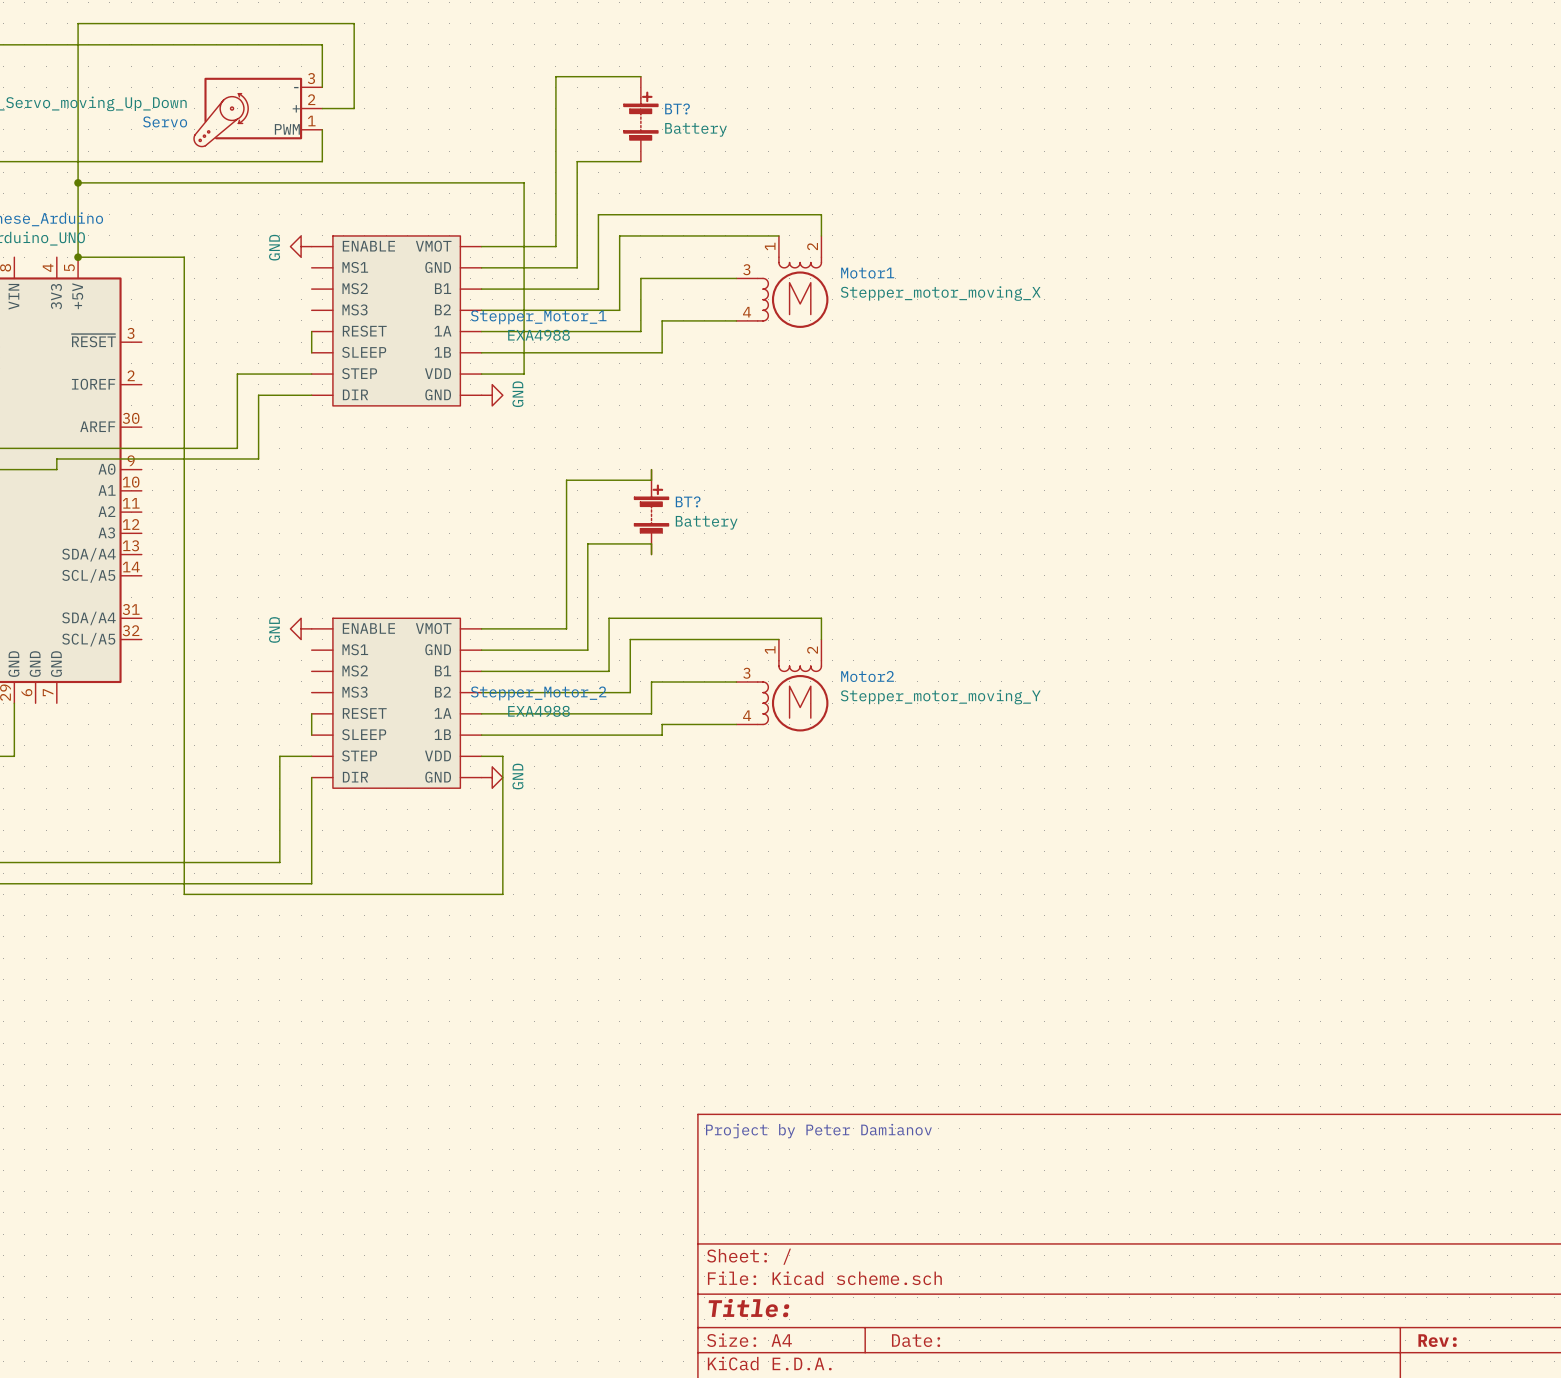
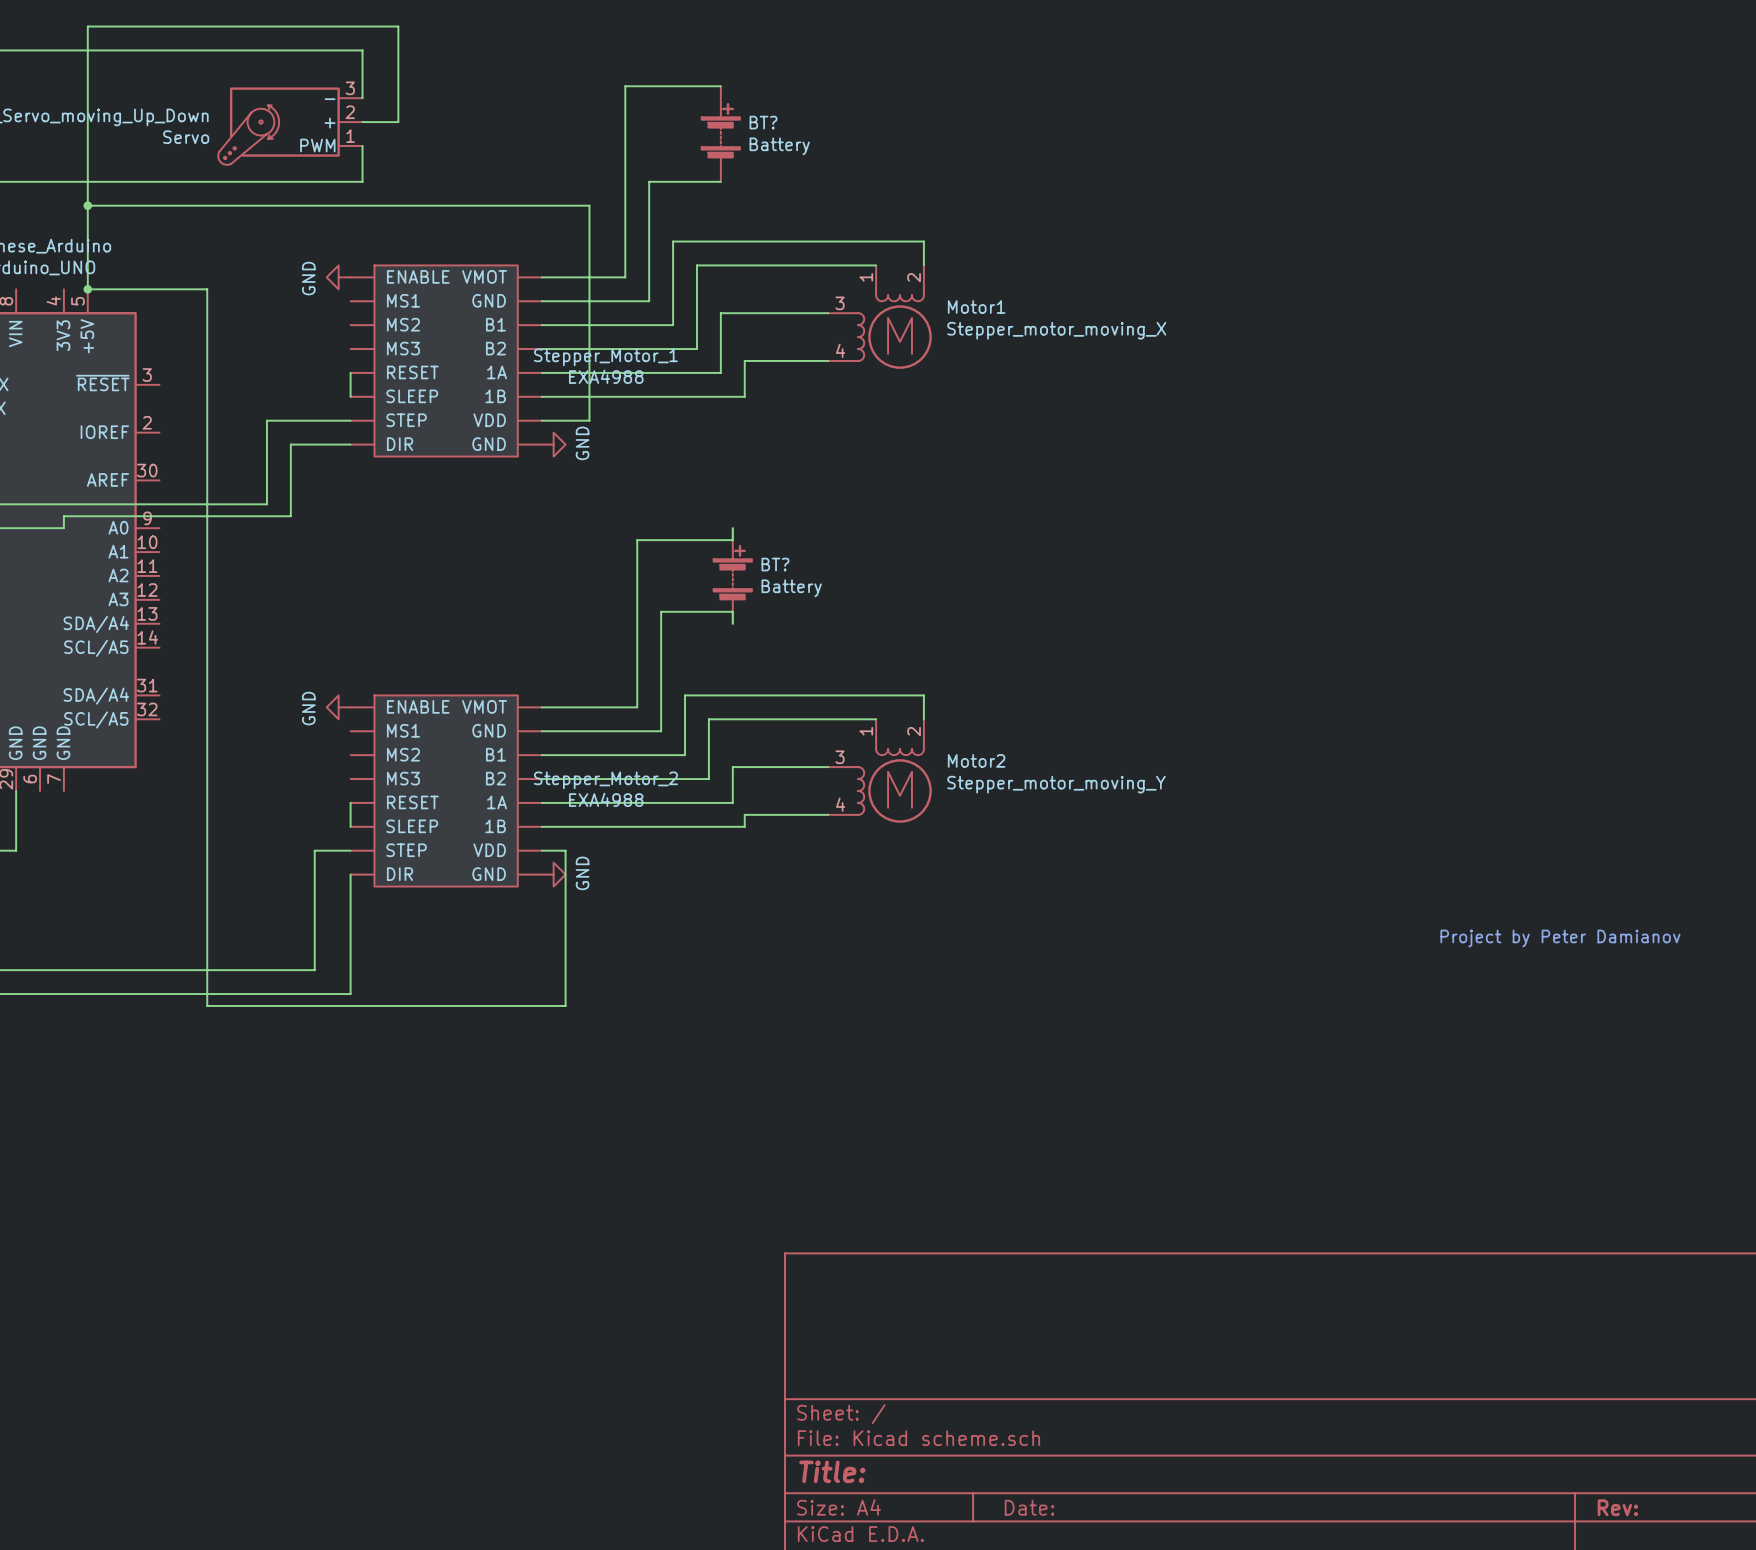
text: none -> Project by Peter Damianov (1560, 938)
text: Project by Peter Damianov (818, 1131) -> none

